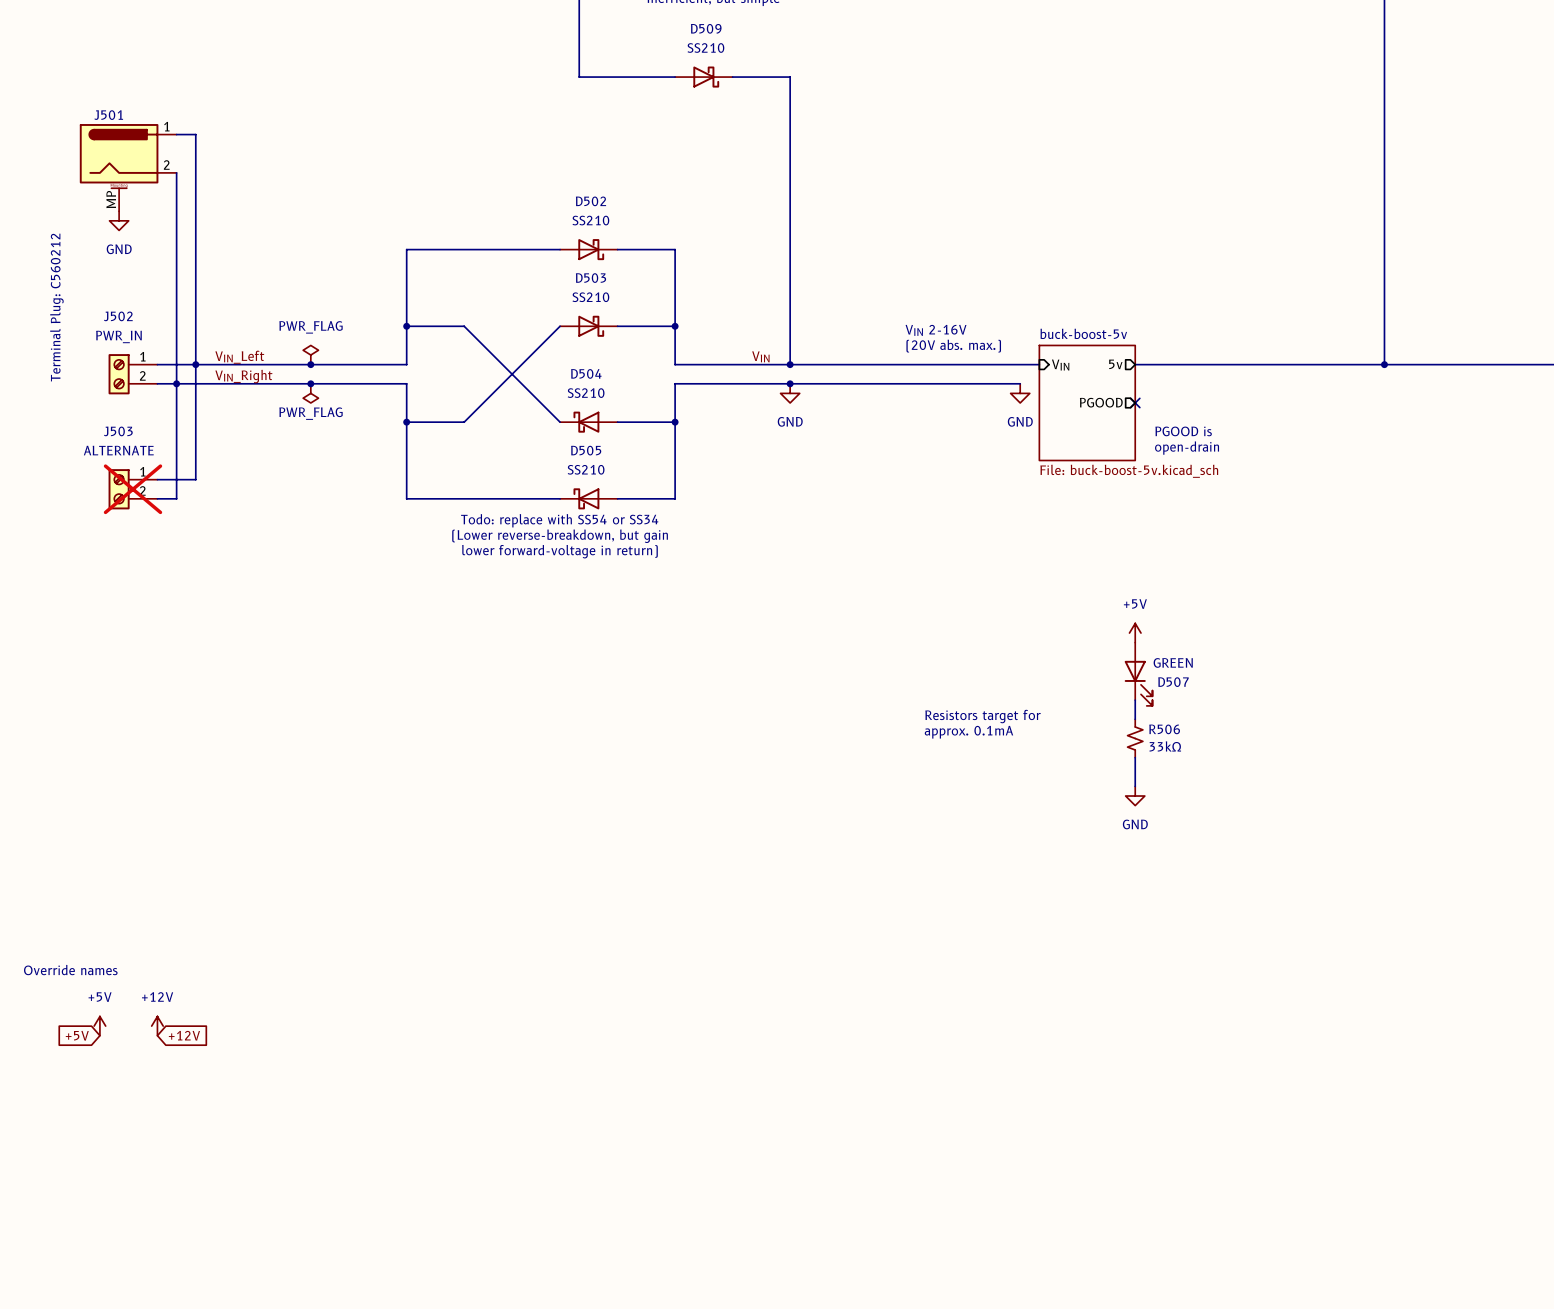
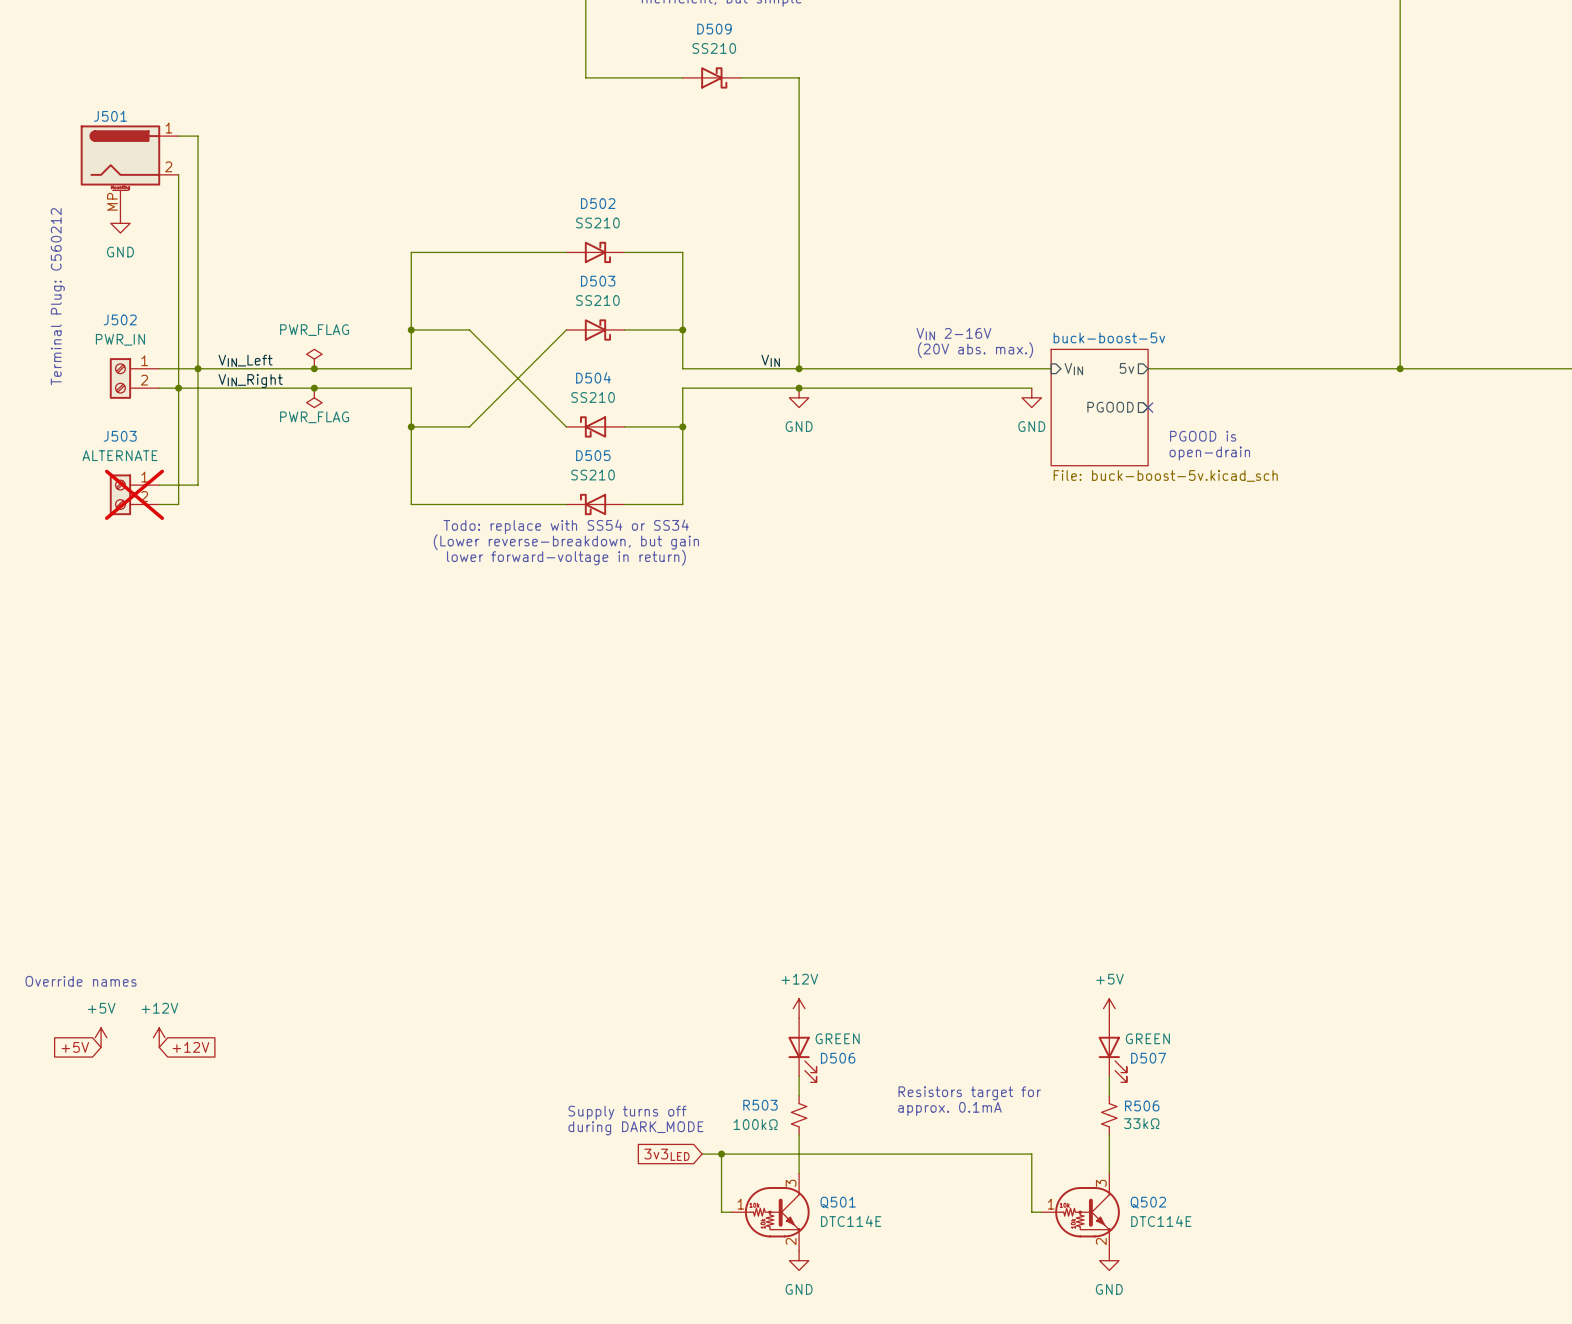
power symbol: +5V (1135, 633) -> none
D507 position: (1138, 674) -> (1112, 1050)
wire: (1135, 700) (1135, 719) -> none
text: Resistors target for (983, 716) -> none
text: approx. 0.1mA (968, 732) -> none
R506 position: (1135, 738) -> (1109, 1115)
wire: (1135, 757) (1135, 786) -> none
power symbol: GND (1135, 796) -> none
power symbol: none -> +12V (799, 1008)
power symbol: none -> +5V (1109, 1008)
D506: none -> GREEN (802, 1050)
wire: none -> (799, 1076) (799, 1095)
wire: none -> (1109, 1076) (1109, 1095)
text: none -> Resistors target for (969, 1093)
text: none -> approx. 0.1mA (949, 1108)
text: none -> Supply turns off (627, 1112)
R503: none -> 100kΩ (799, 1115)
text: none -> during DARK_MODE (635, 1128)
wire: none -> (799, 1134) (799, 1173)
wire: none -> (1109, 1134) (1109, 1173)
global label: none -> 3v3LED (666, 1154)
wire: none -> (702, 1154) (1031, 1154) (1031, 1212) (1041, 1212)
wire: none -> (721, 1154) (721, 1212) (731, 1212)
junction: none -> (721, 1154)
Q501: none -> DTC114E (770, 1212)
Q502: none -> DTC114E (1080, 1212)
power symbol: none -> GND (799, 1260)
power symbol: none -> GND (1109, 1260)

